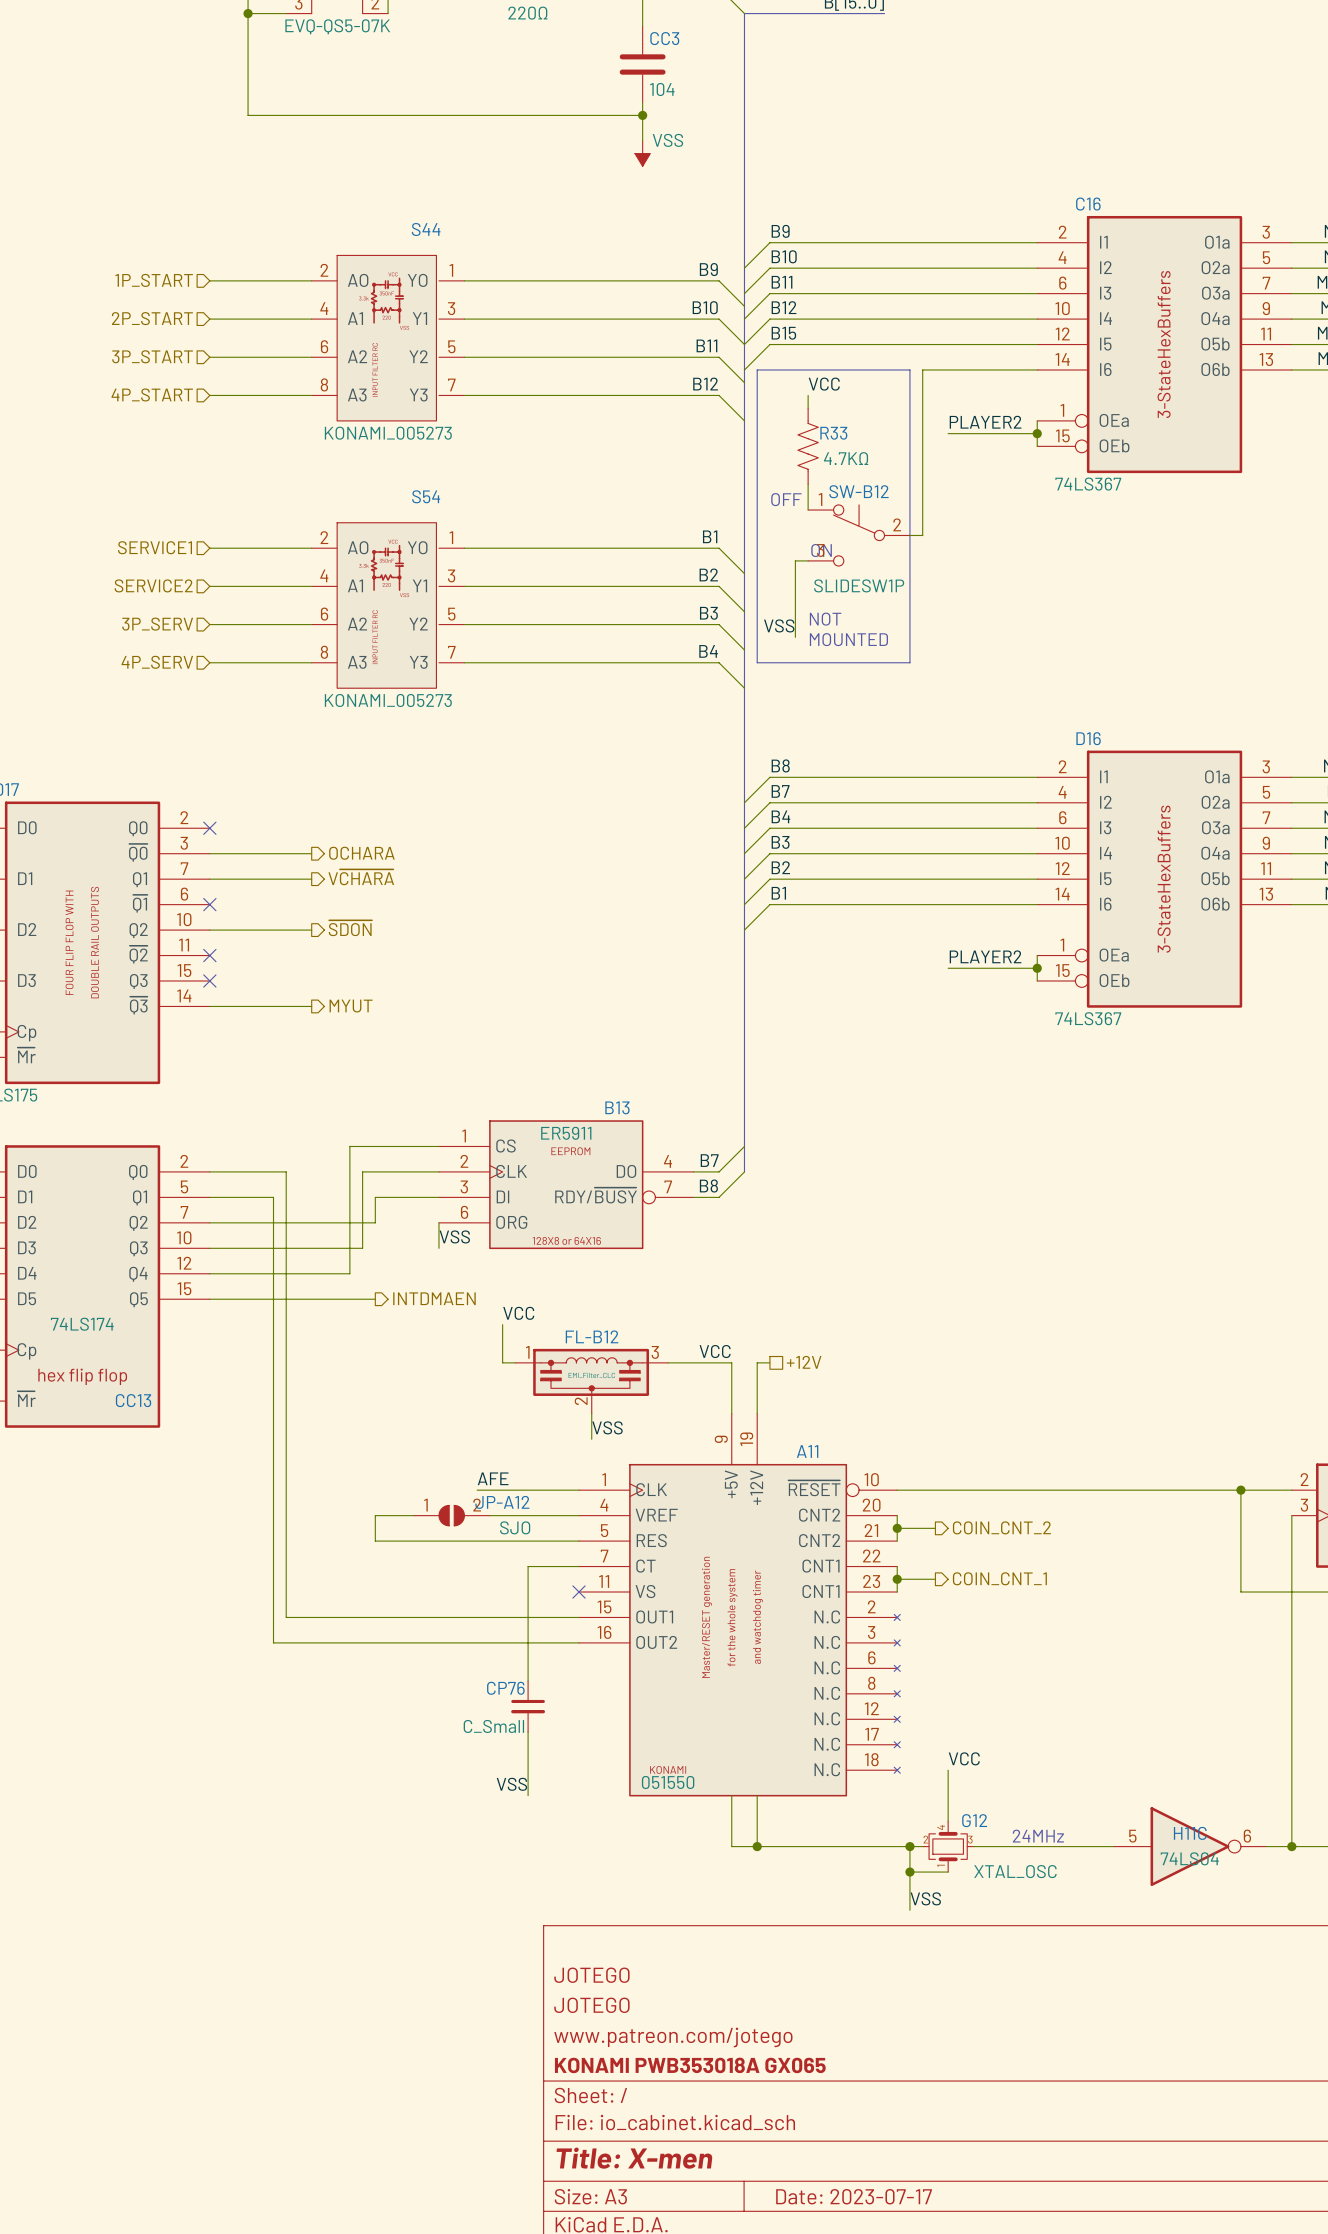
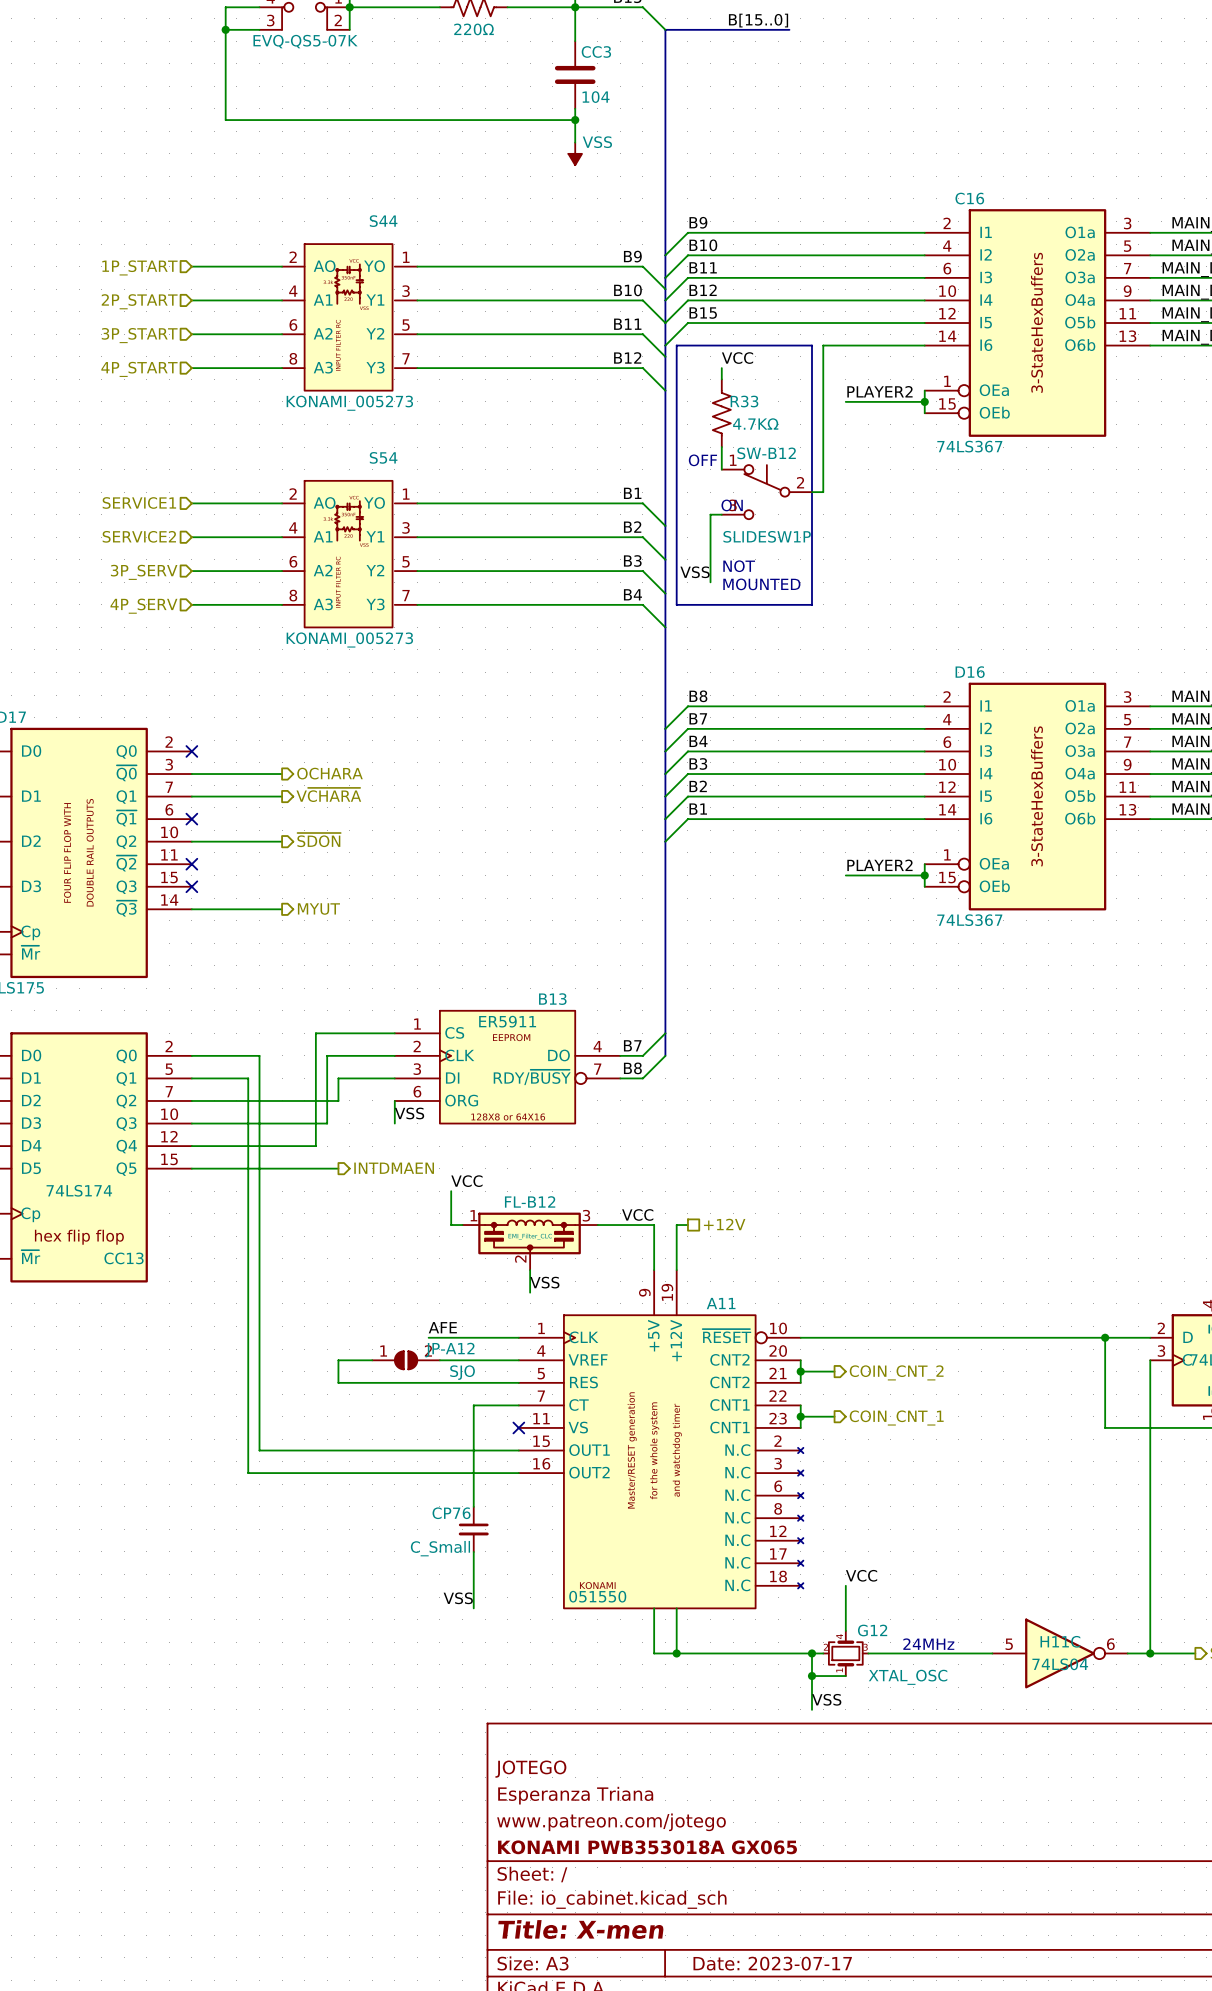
title block: JOTEGO (591, 2005) -> Esperanza Triana (575, 1795)

